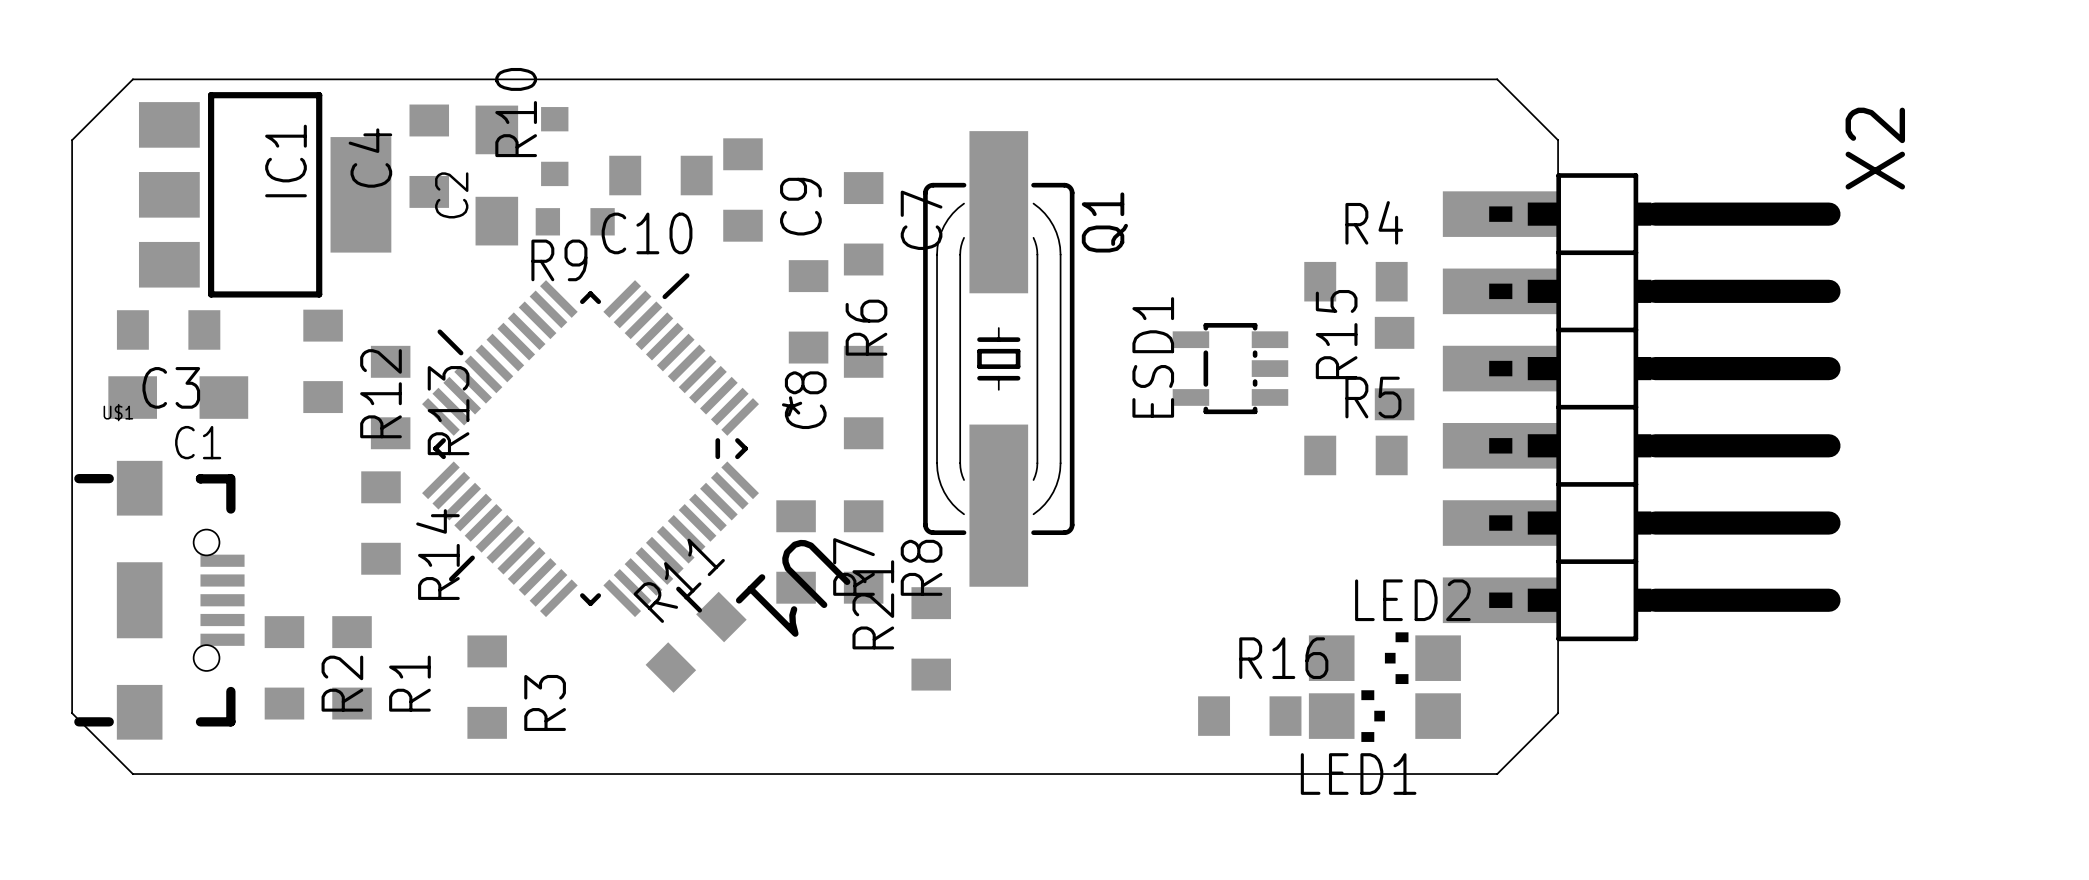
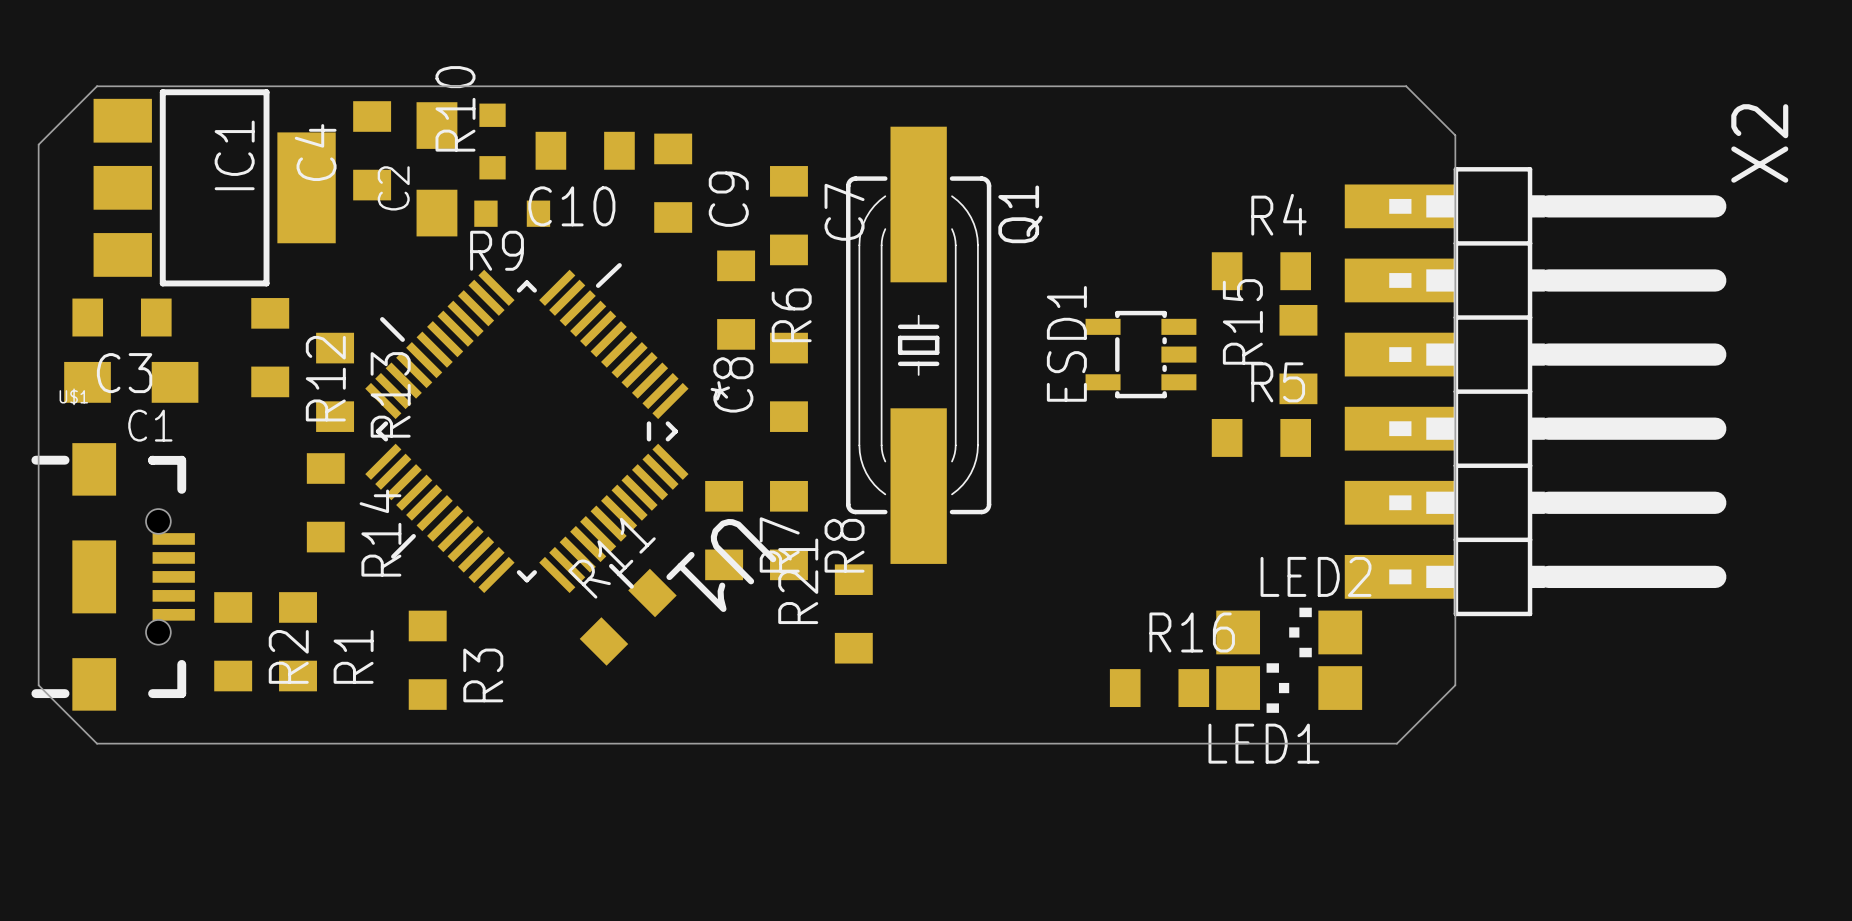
board edge: (1506, 89) (1497, 79) (132, 79) (72, 140) (72, 713) (132, 774) (142, 774) -> (1406, 86) (97, 86) (38, 144) (38, 685) (97, 743)
C10 position: (660, 175) -> (585, 150)

